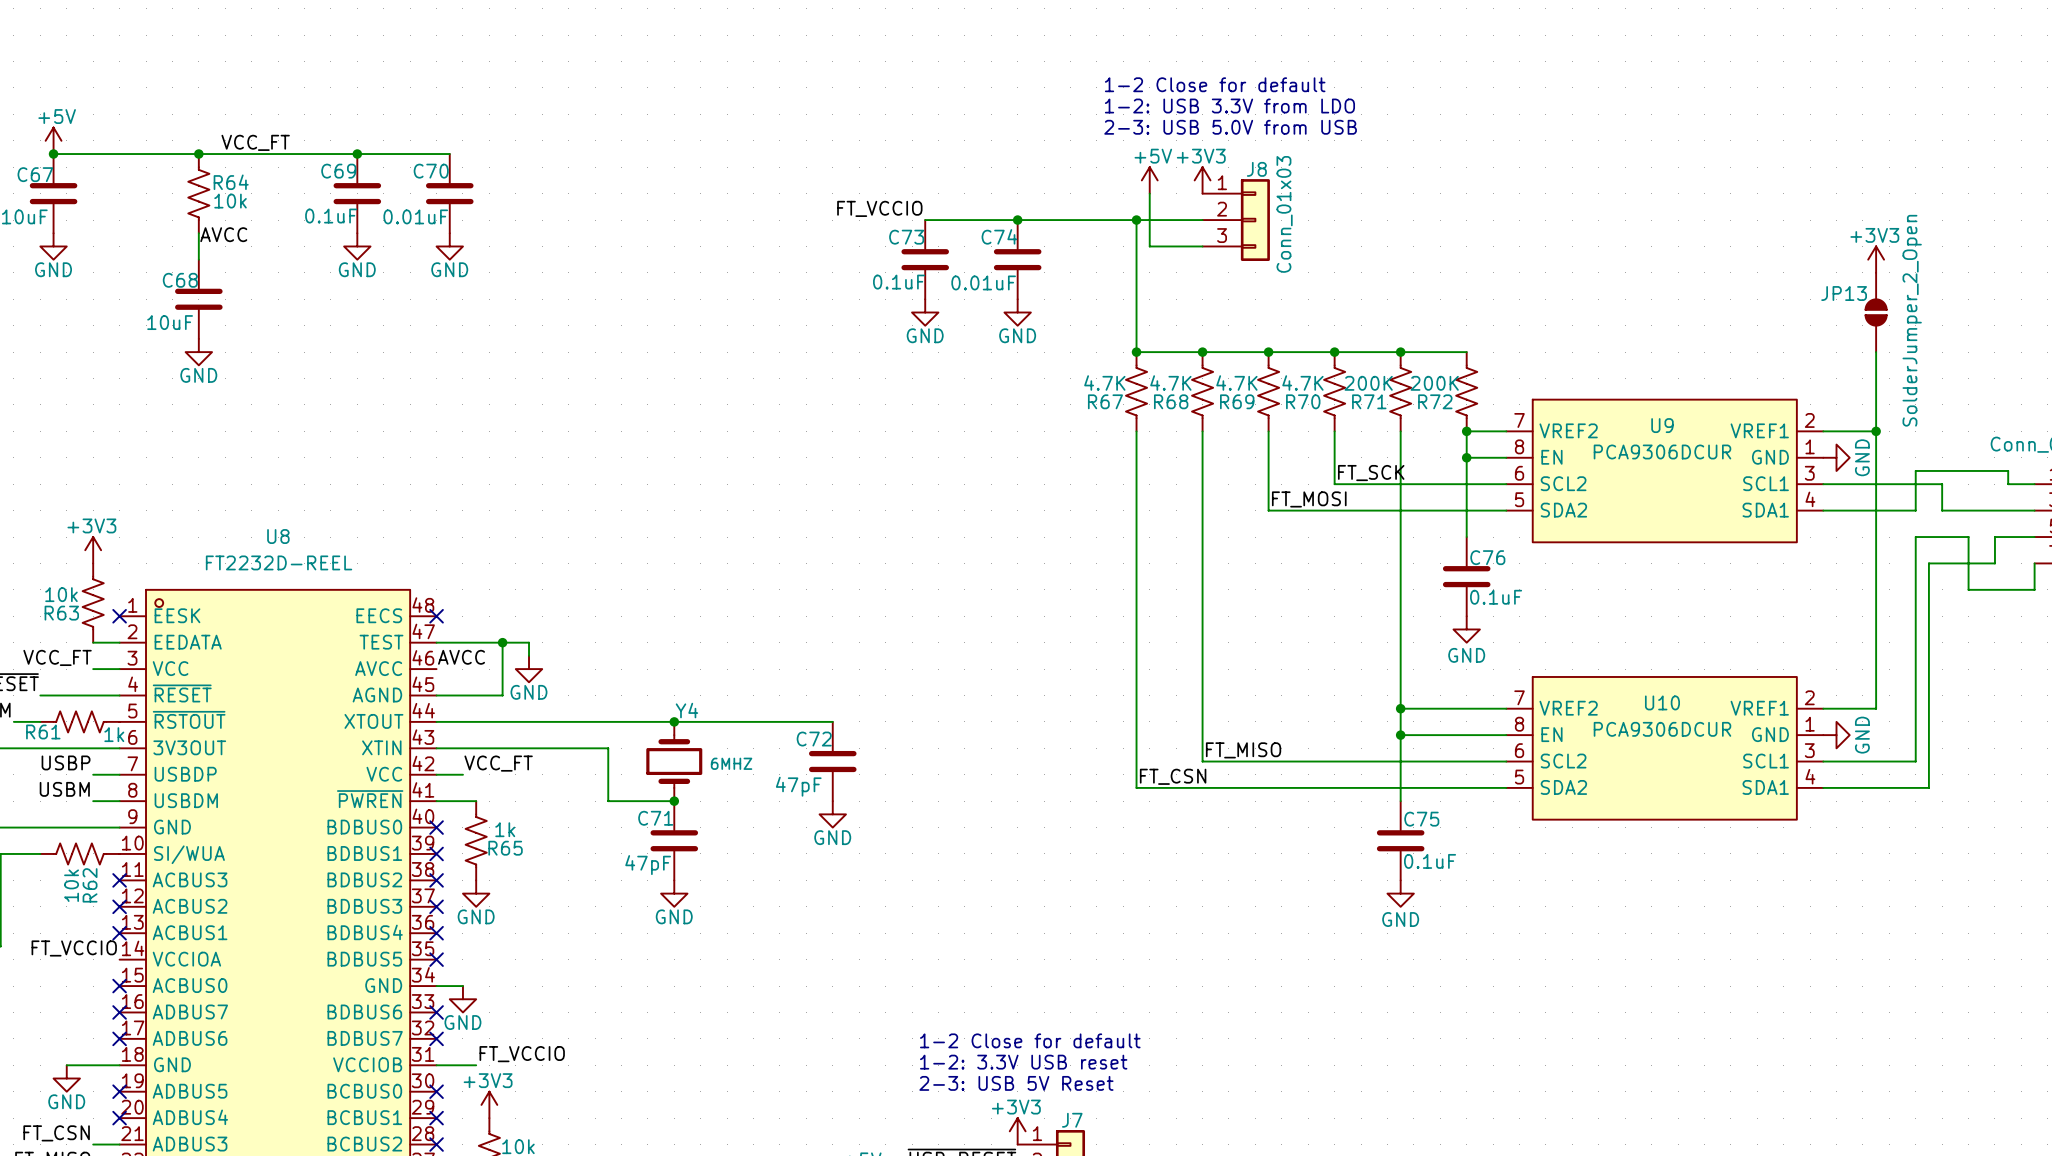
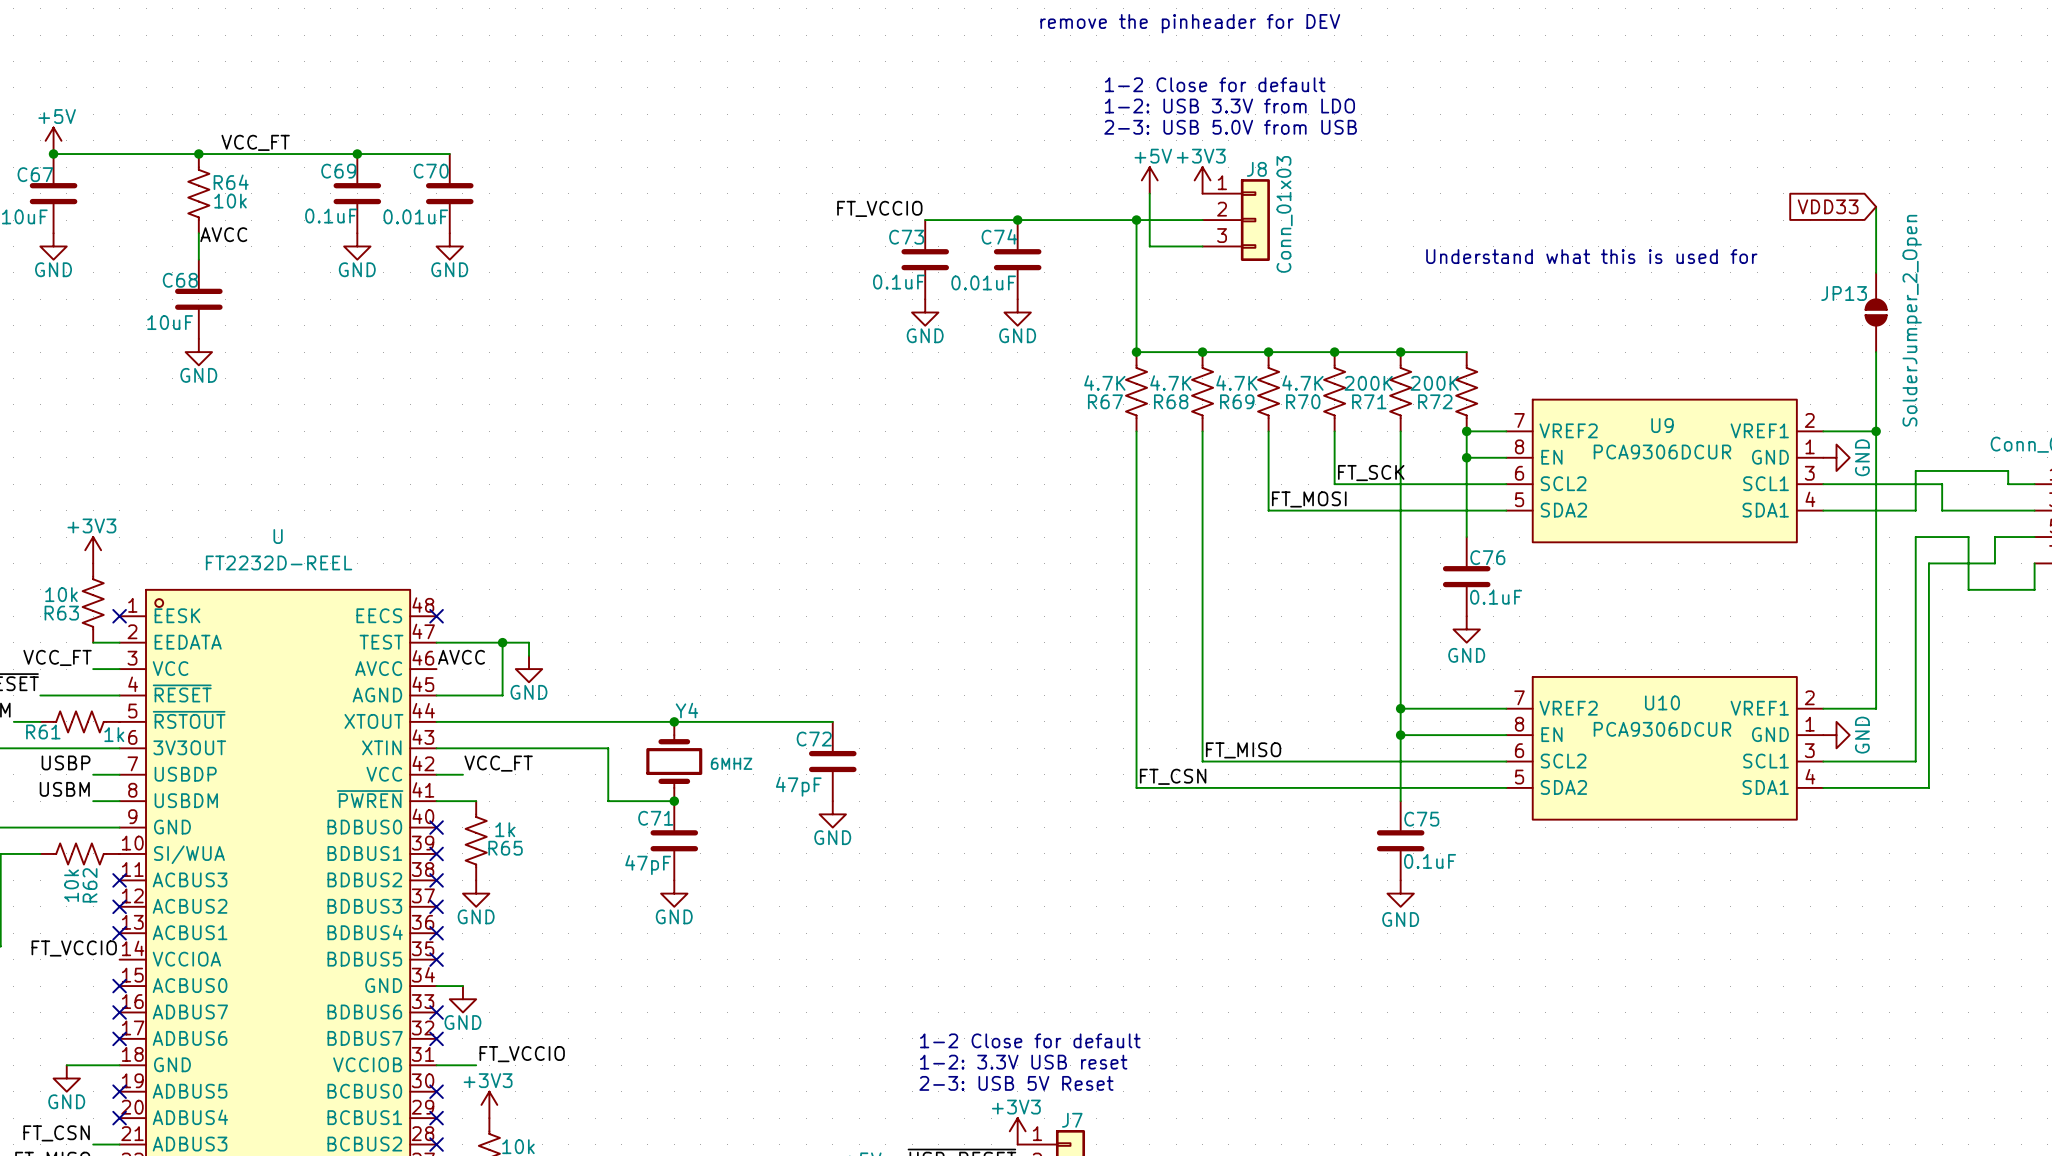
text: none -> remove the pinheader for DEV (1190, 23)
global label: none -> VDD33 (1828, 206)
wire: none -> (1876, 206) (1876, 272)
text: none -> Understand what this is used for (1591, 256)
power symbol: +3V3 (1876, 259) -> none
U8 name: U8 (278, 536) -> U (278, 536)

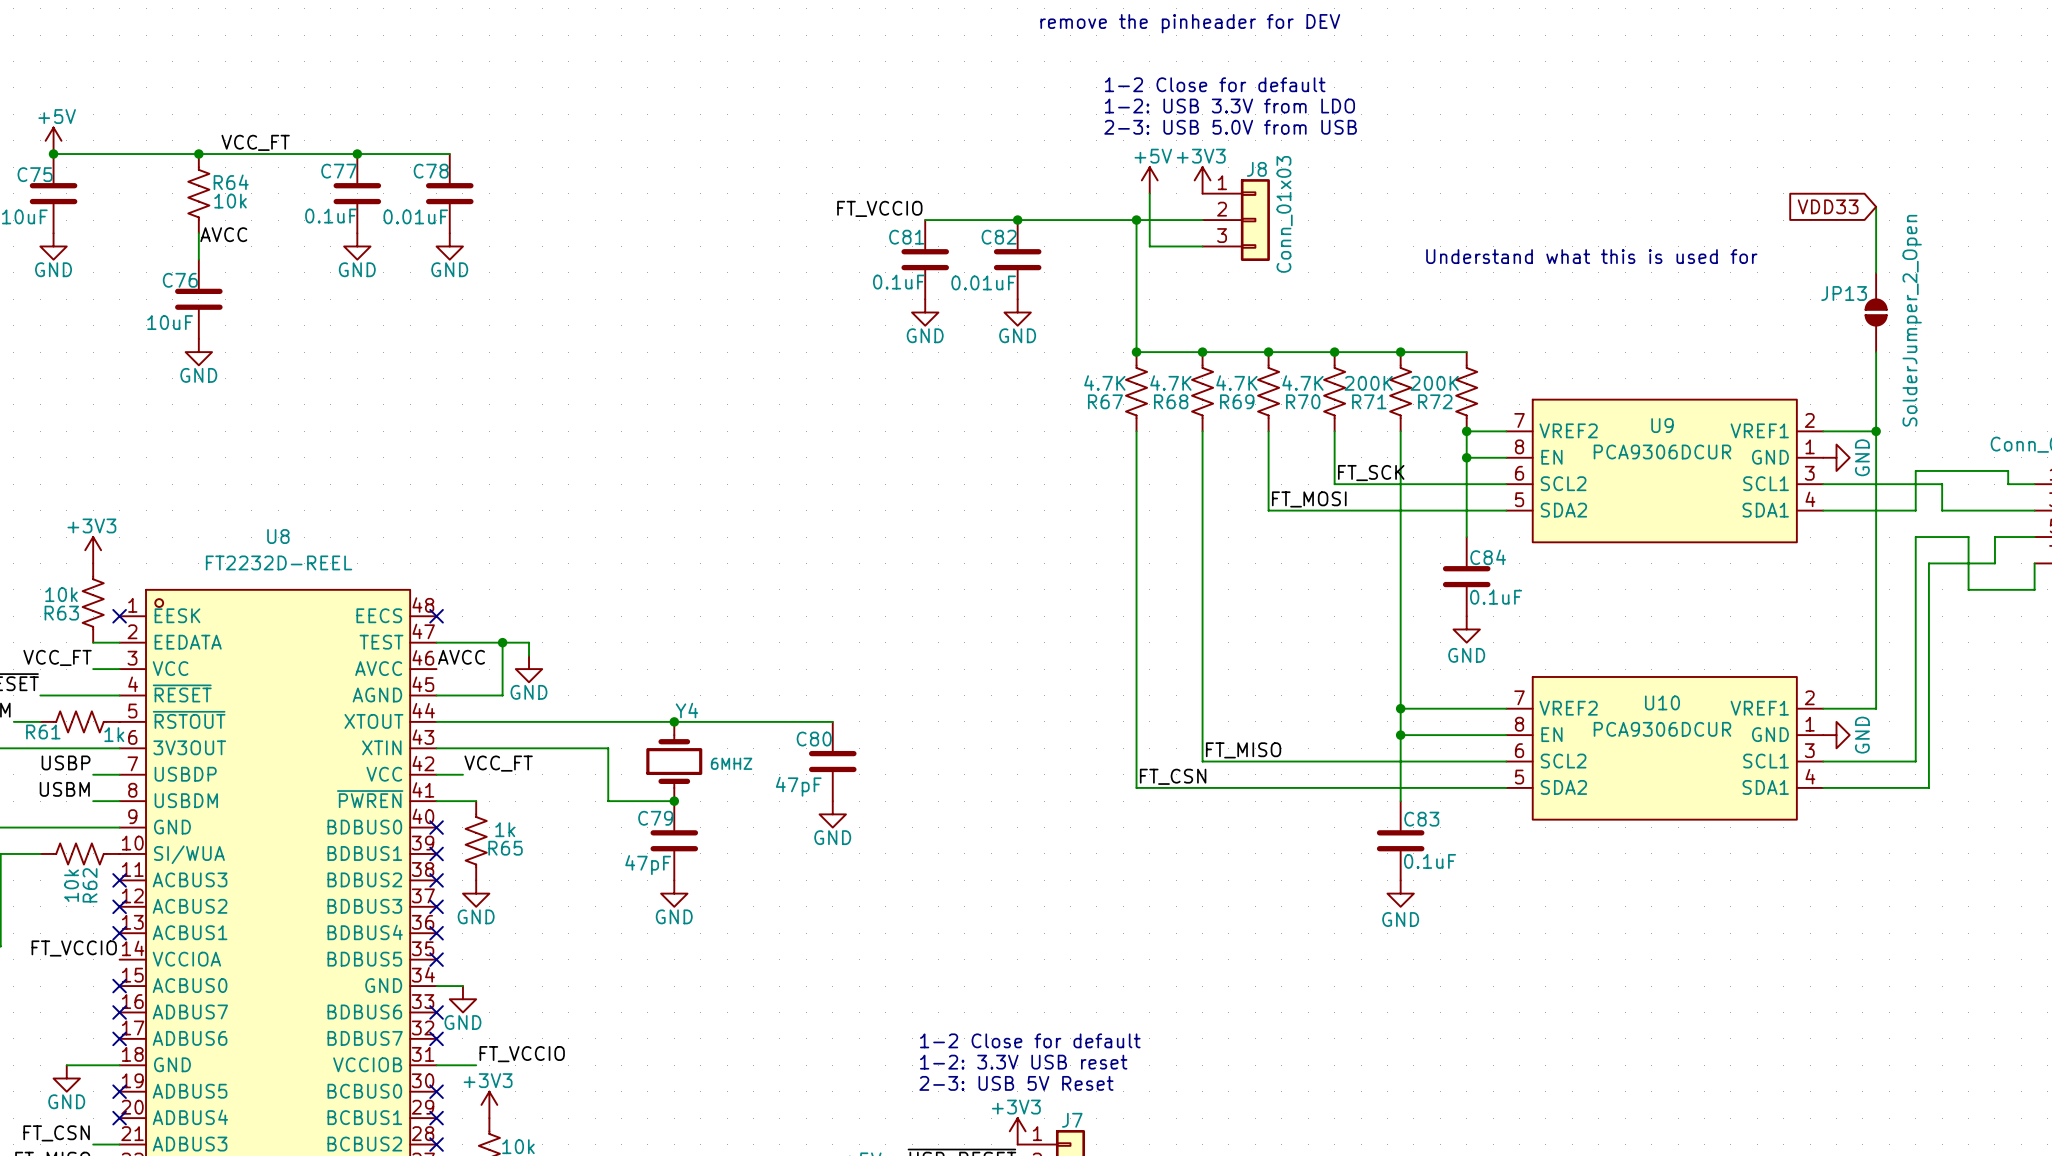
C69 name: C69 (338, 171) -> C77 (339, 171)
C70 name: C70 (431, 171) -> C78 (431, 171)
C67 name: C67 (35, 174) -> C75 (35, 174)
C74 name: C74 (999, 236) -> C82 (999, 237)
C73 name: C73 (906, 237) -> C81 (906, 237)
C68 name: C68 (180, 280) -> C76 (180, 280)
U name: U (278, 536) -> U8 (278, 536)
C76 name: C76 (1487, 557) -> C84 (1488, 557)
C72 name: C72 (814, 739) -> C80 (814, 739)
C71 name: C71 (655, 818) -> C79 (655, 818)
C75 name: C75 (1421, 819) -> C83 (1421, 819)

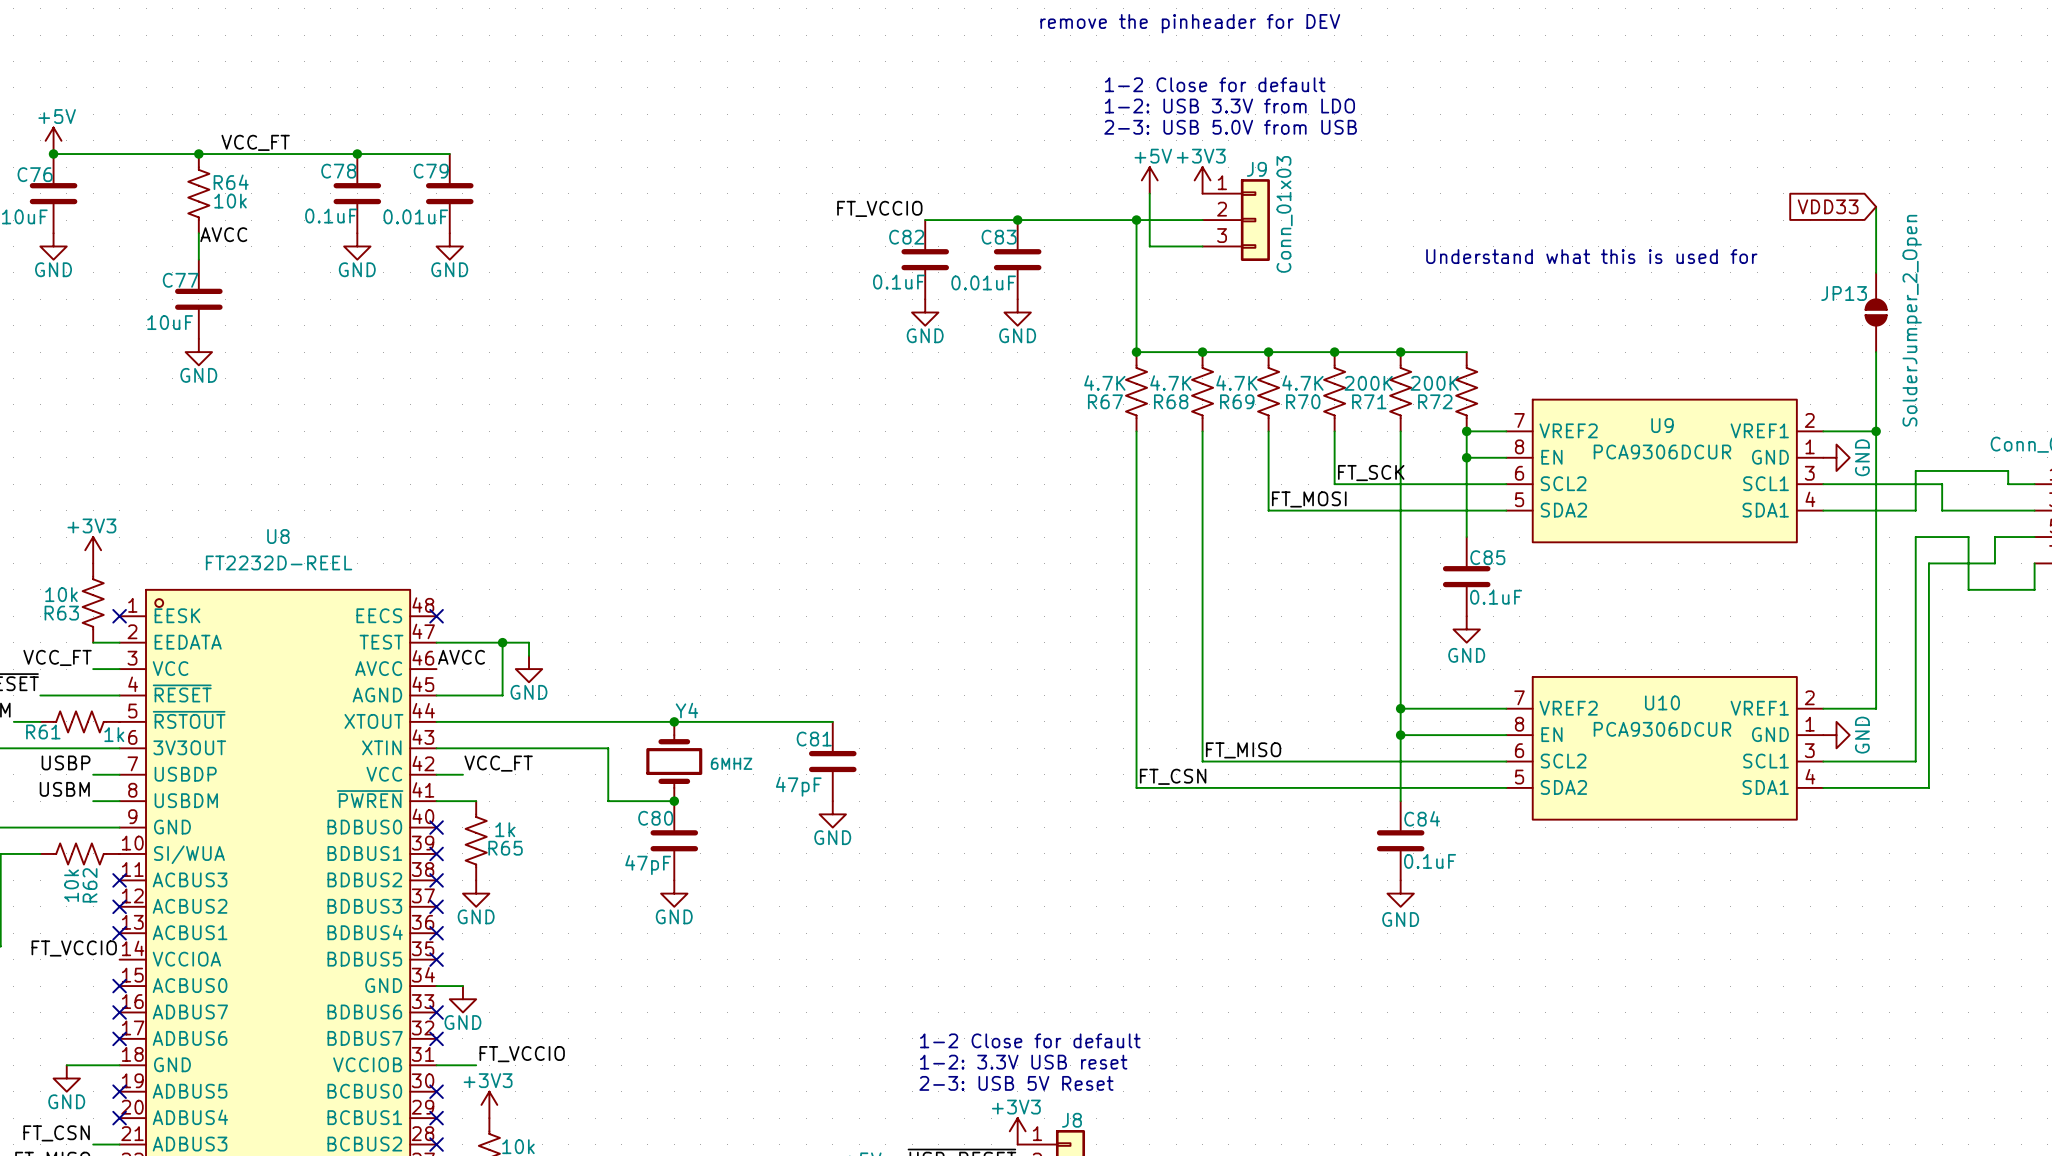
J8 name: J8 (1256, 169) -> J9 (1256, 169)
C77 name: C77 (339, 171) -> C78 (338, 171)
C78 name: C78 (431, 171) -> C79 (431, 171)
C75 name: C75 (35, 174) -> C76 (35, 174)
C81 name: C81 (906, 237) -> C82 (906, 237)
C82 name: C82 (999, 237) -> C83 (999, 237)
C76 name: C76 (180, 280) -> C77 (180, 280)
C84 name: C84 (1488, 557) -> C85 (1487, 557)
C80 name: C80 (814, 739) -> C81 (814, 739)
C79 name: C79 (655, 818) -> C80 (655, 818)
C83 name: C83 (1421, 819) -> C84 (1422, 818)
J7 name: J7 (1072, 1120) -> J8 (1071, 1120)

